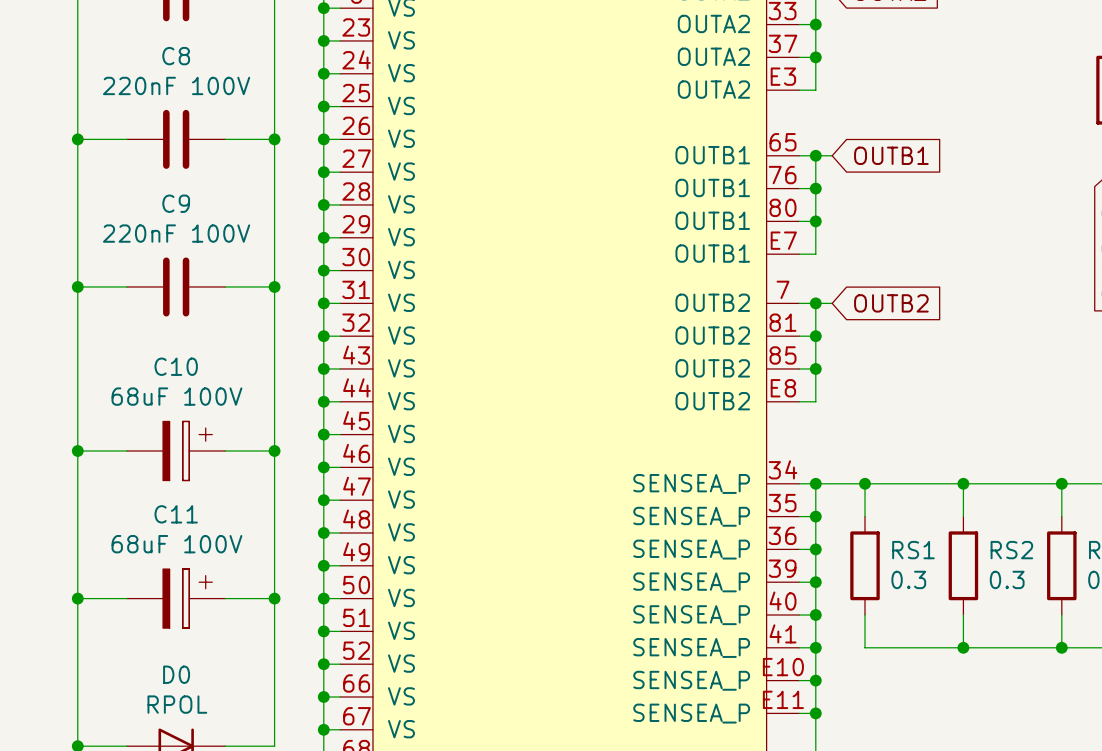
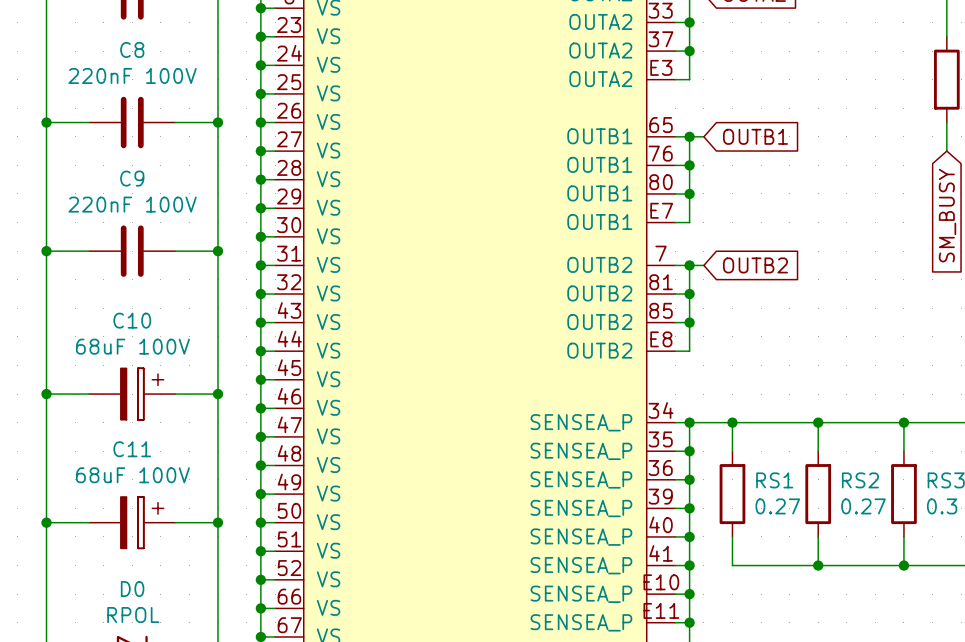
RS1 value: 0.3 (908, 579) -> 0.27 (777, 506)
RS2 value: 0.3 (1007, 579) -> 0.27 (863, 506)

